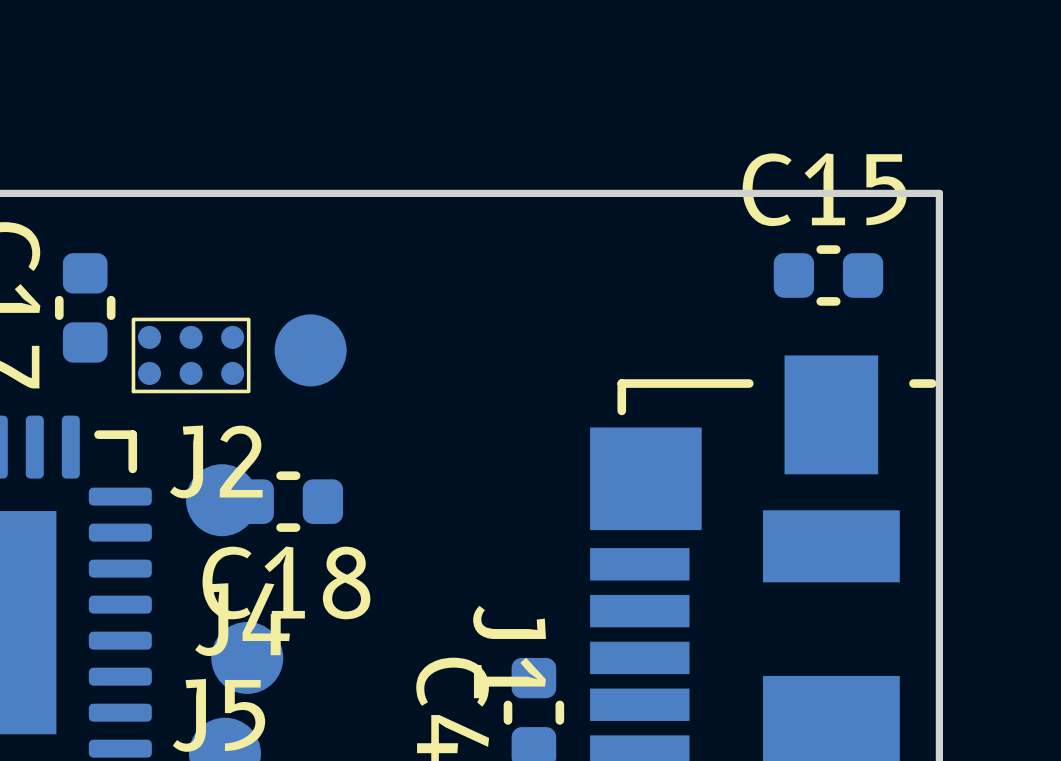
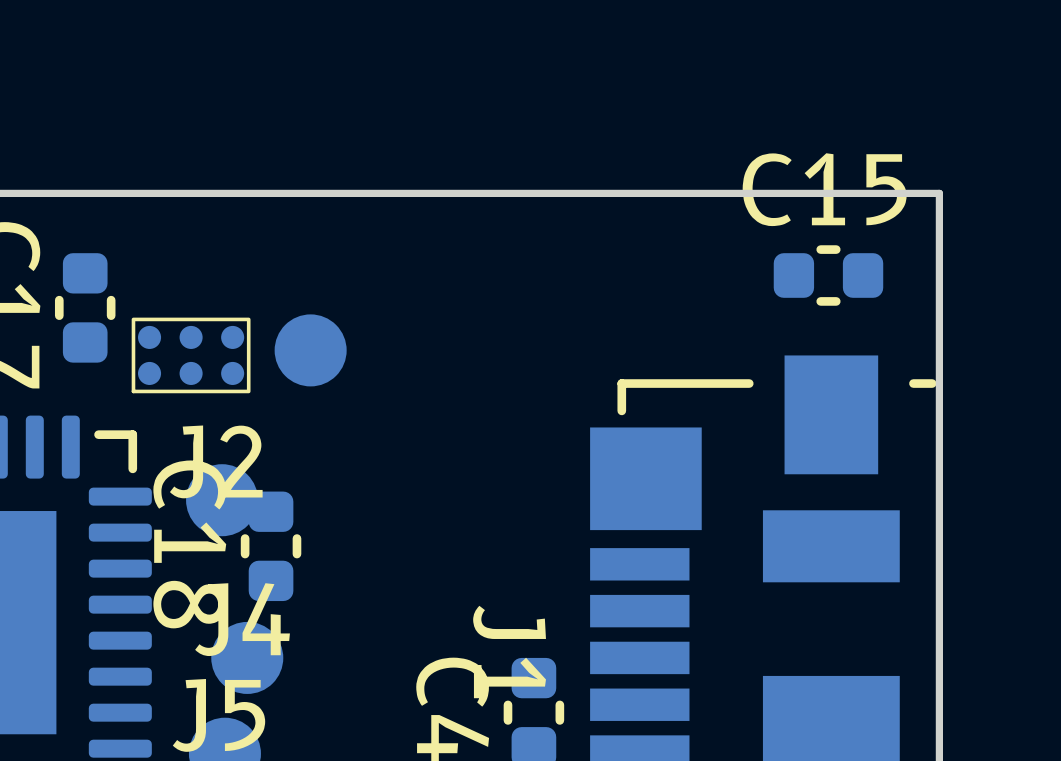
C18 rotation: 0° (288, 501) -> 90° clockwise (271, 546)

